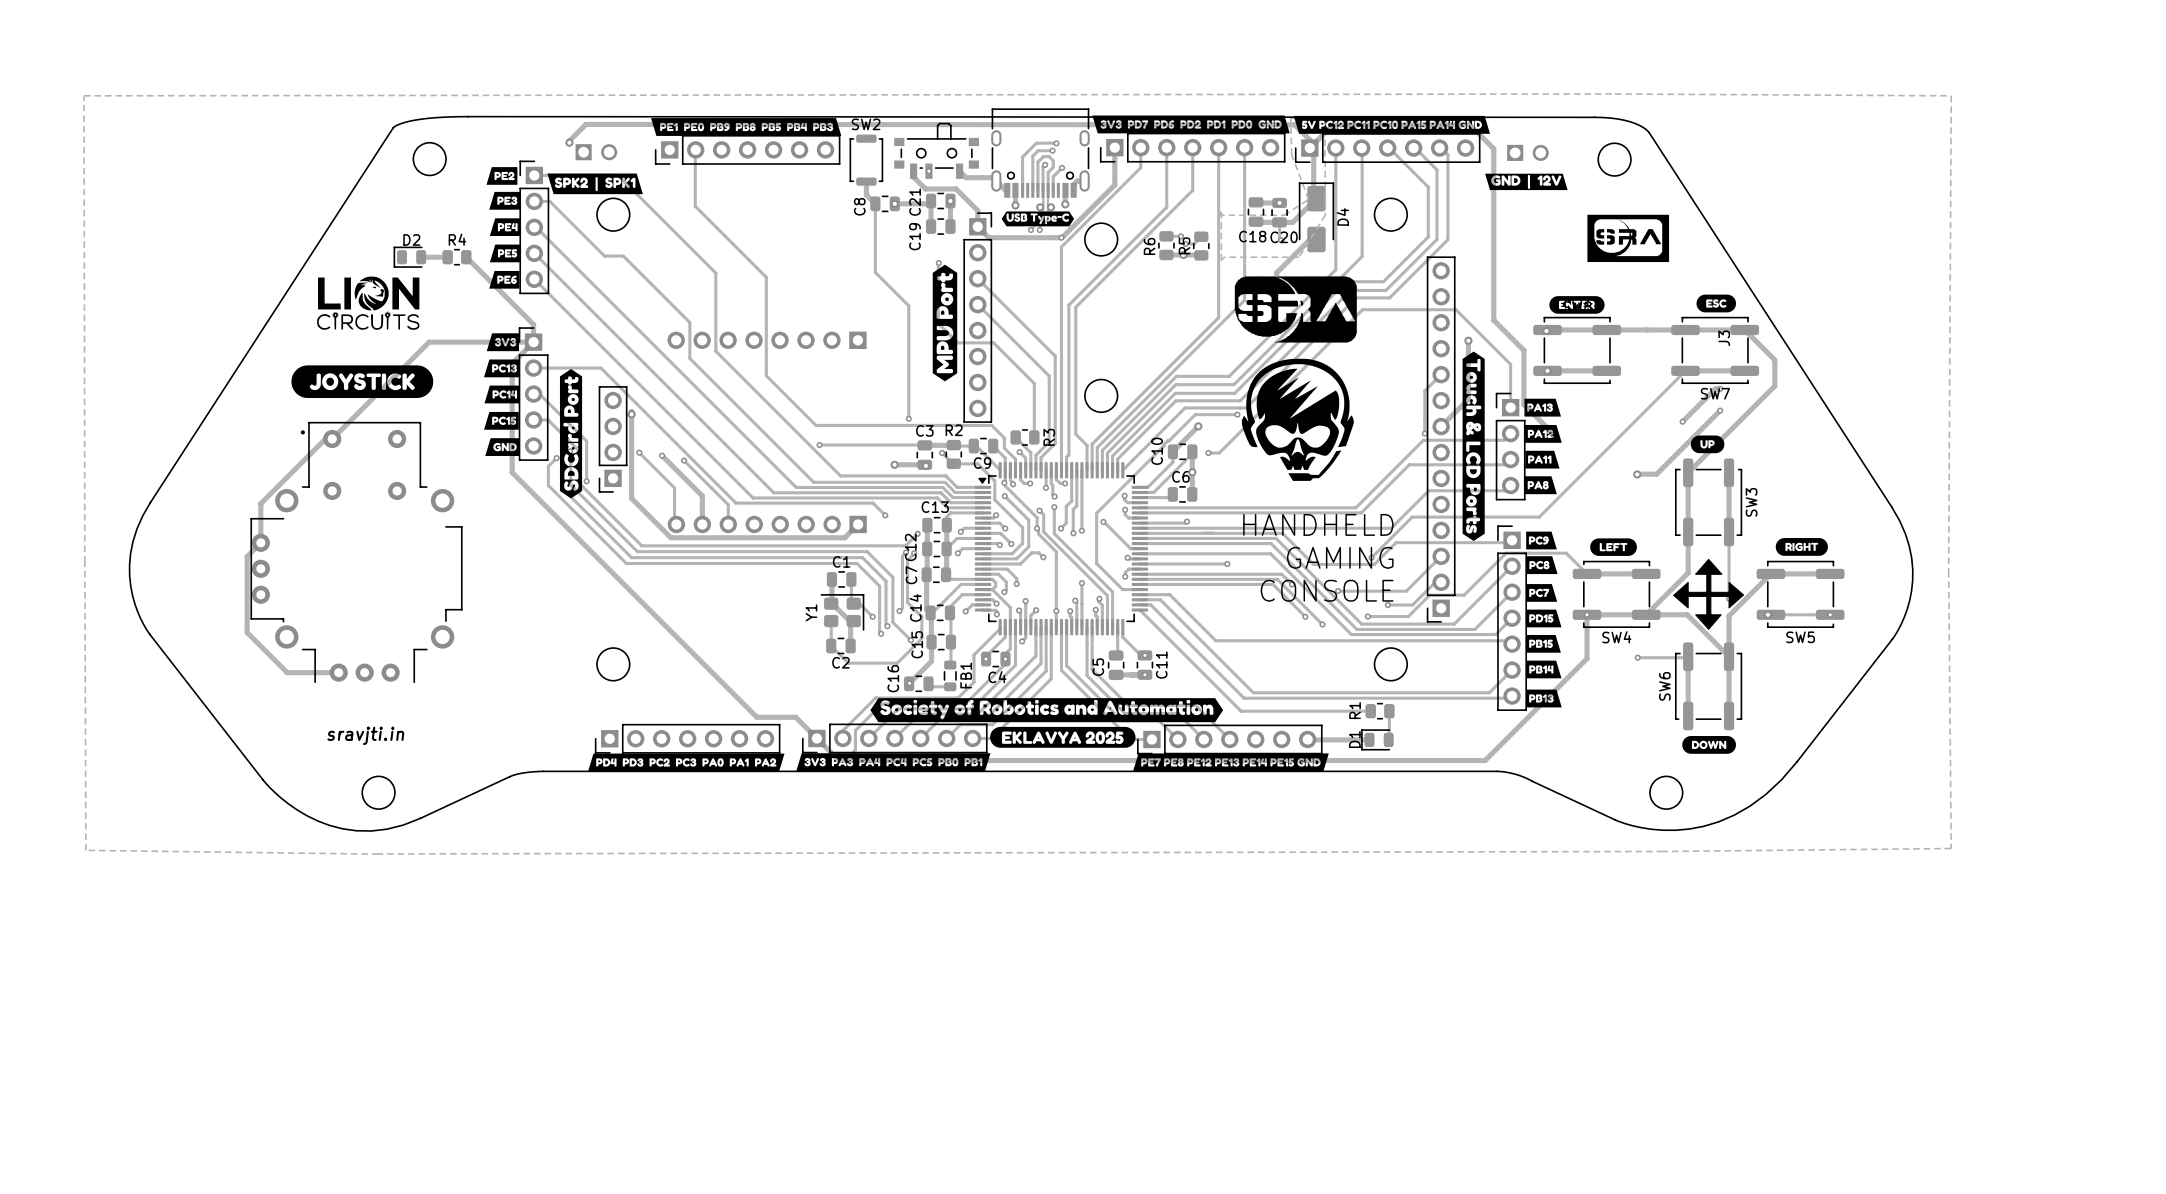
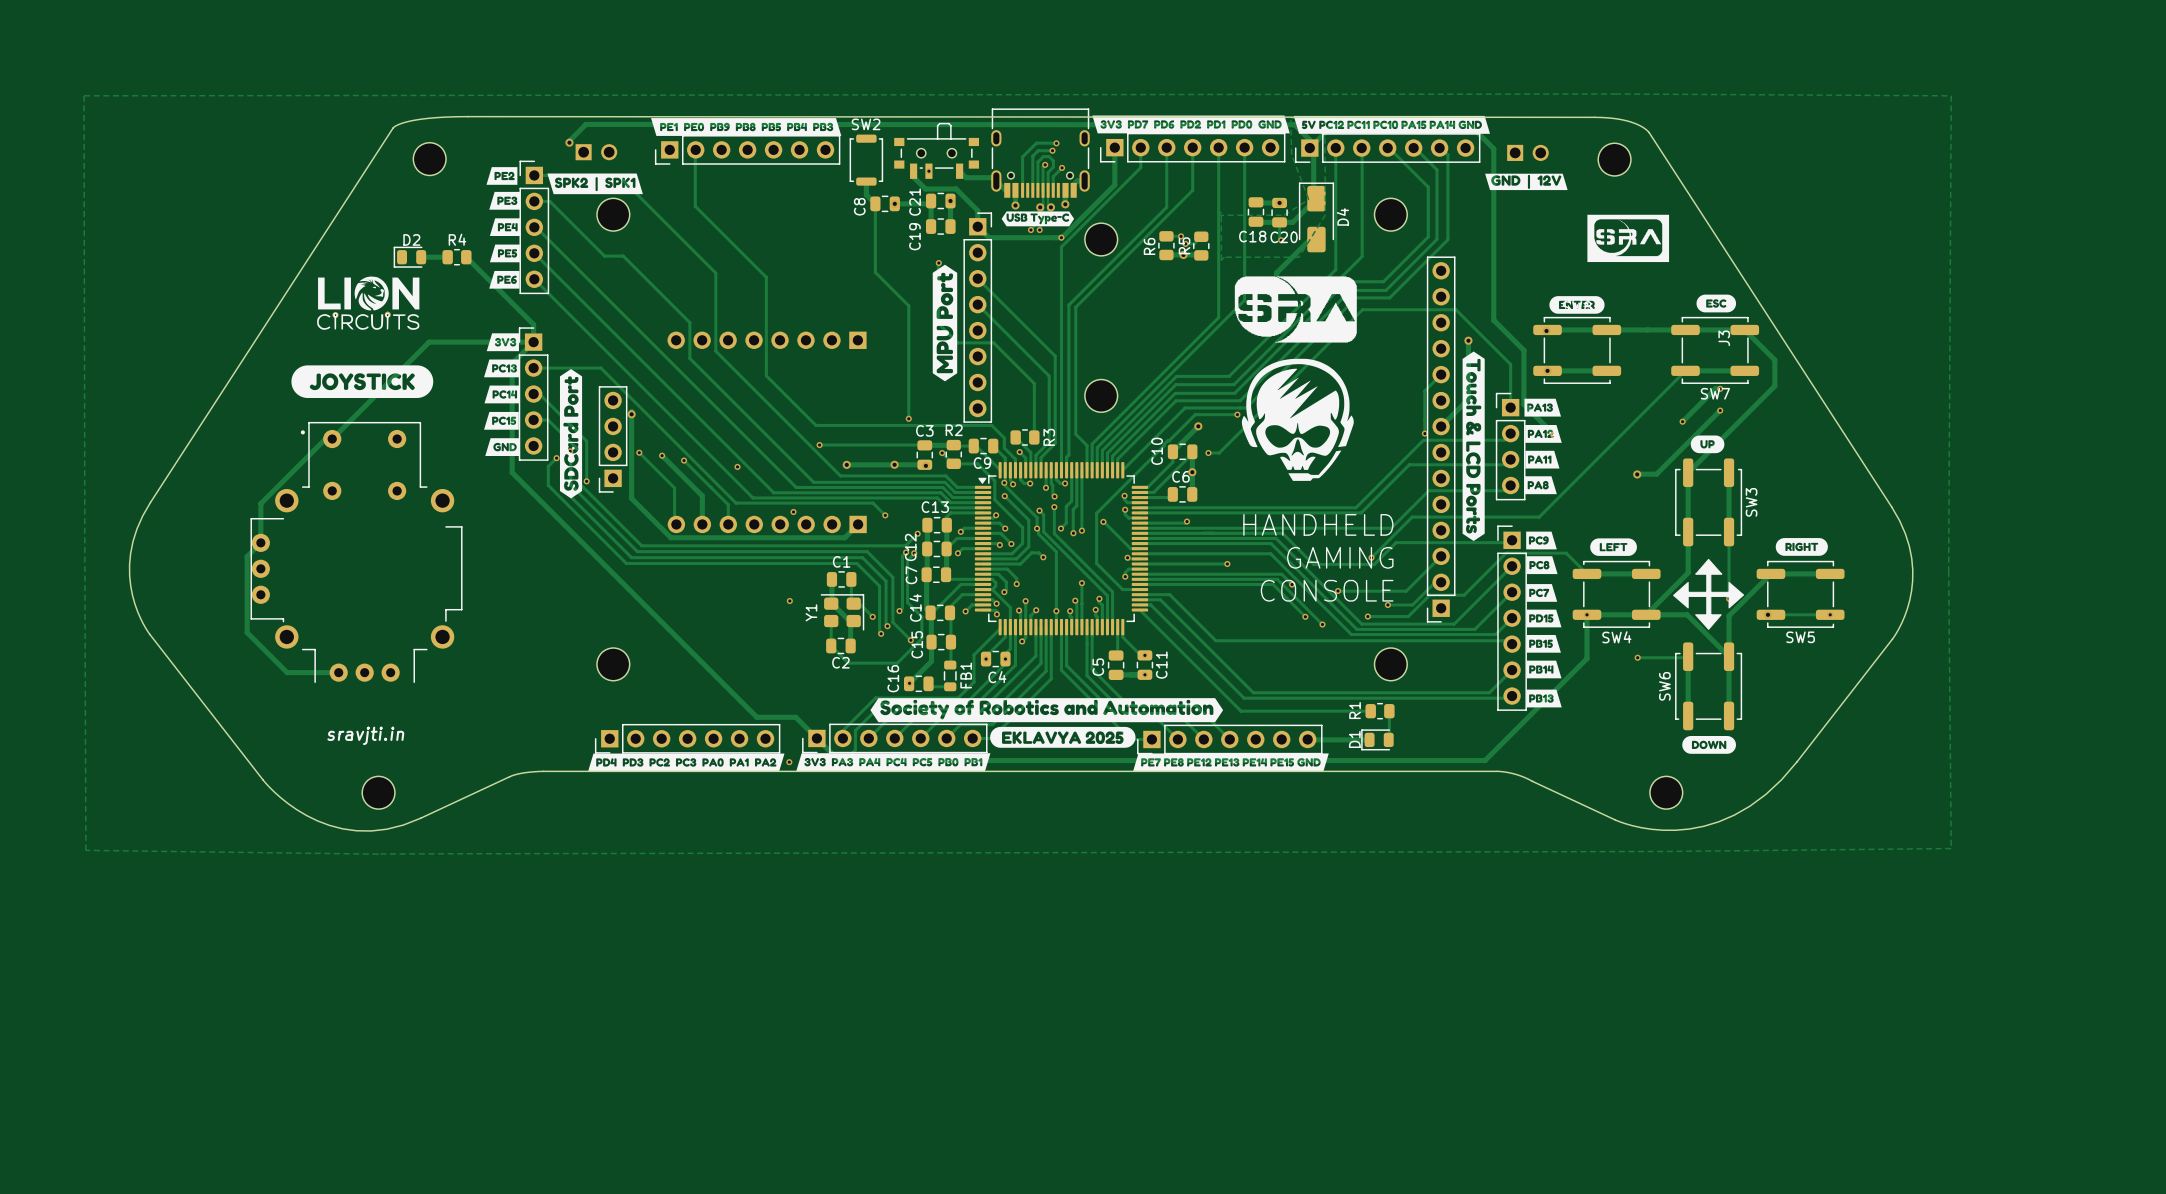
track: none -> (846, 464) (894, 464)
via: none -> (846, 464)
via: none -> (737, 466)
via: none -> (793, 511)
via: none -> (789, 601)
via: none -> (789, 762)

